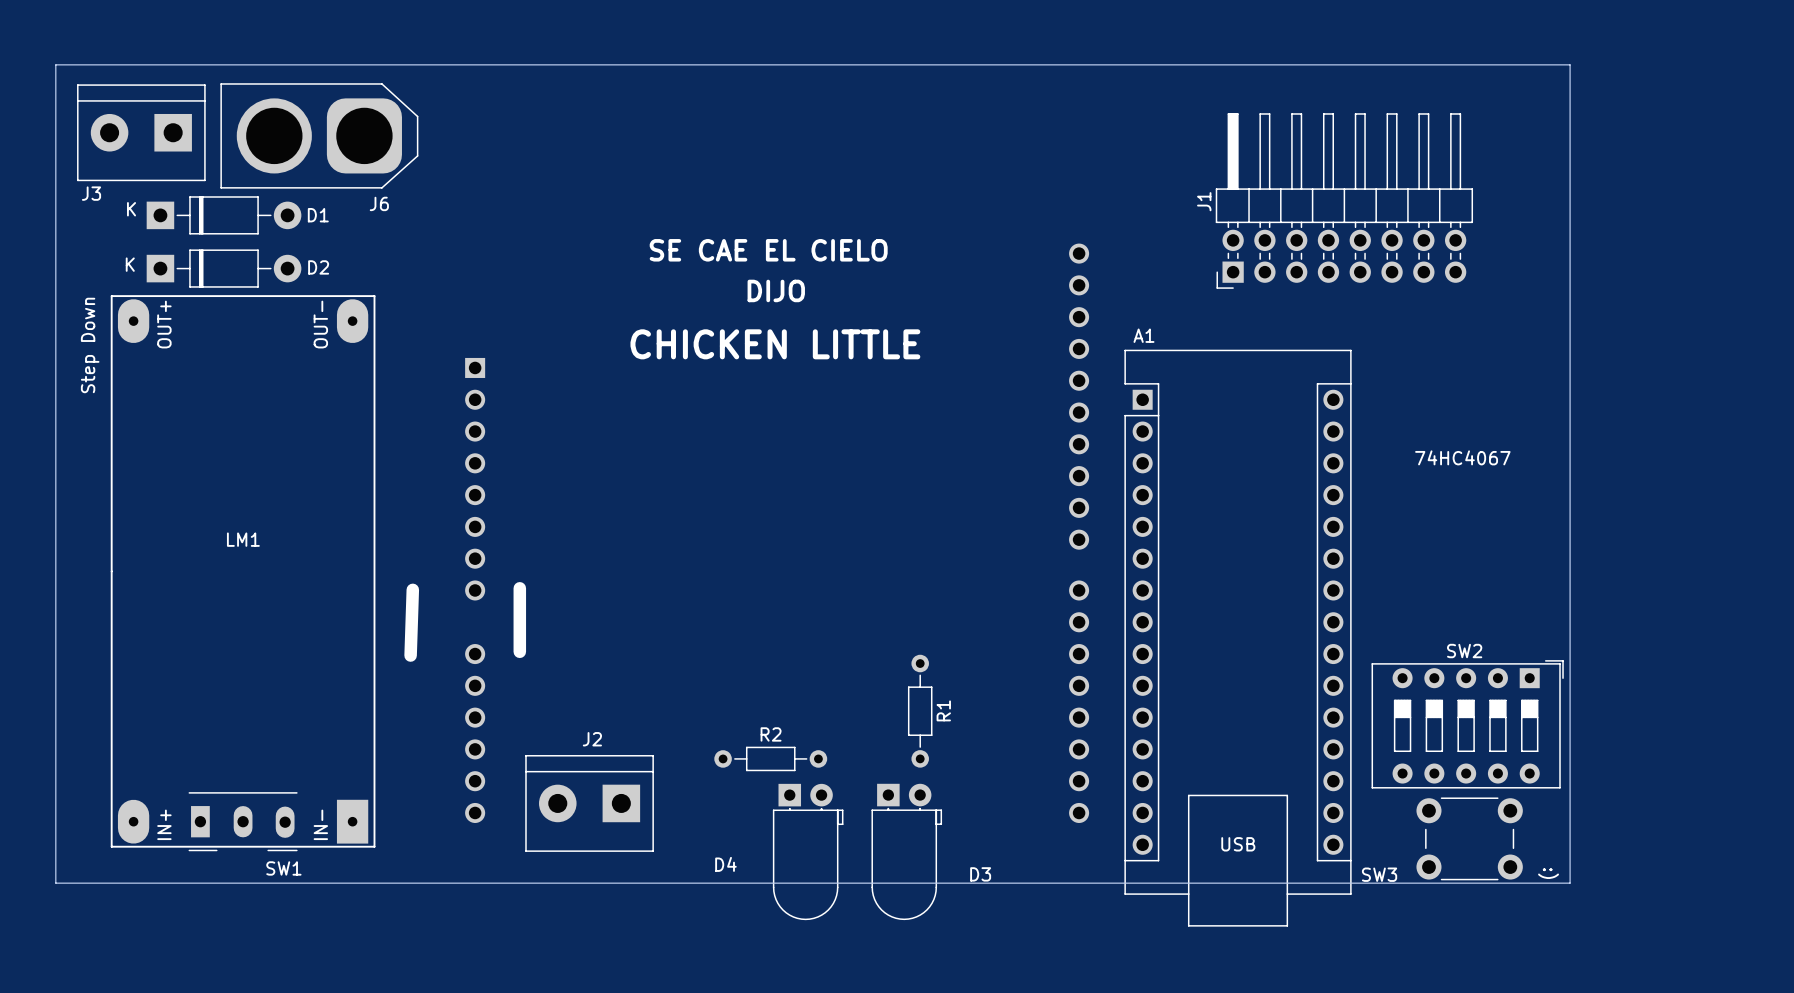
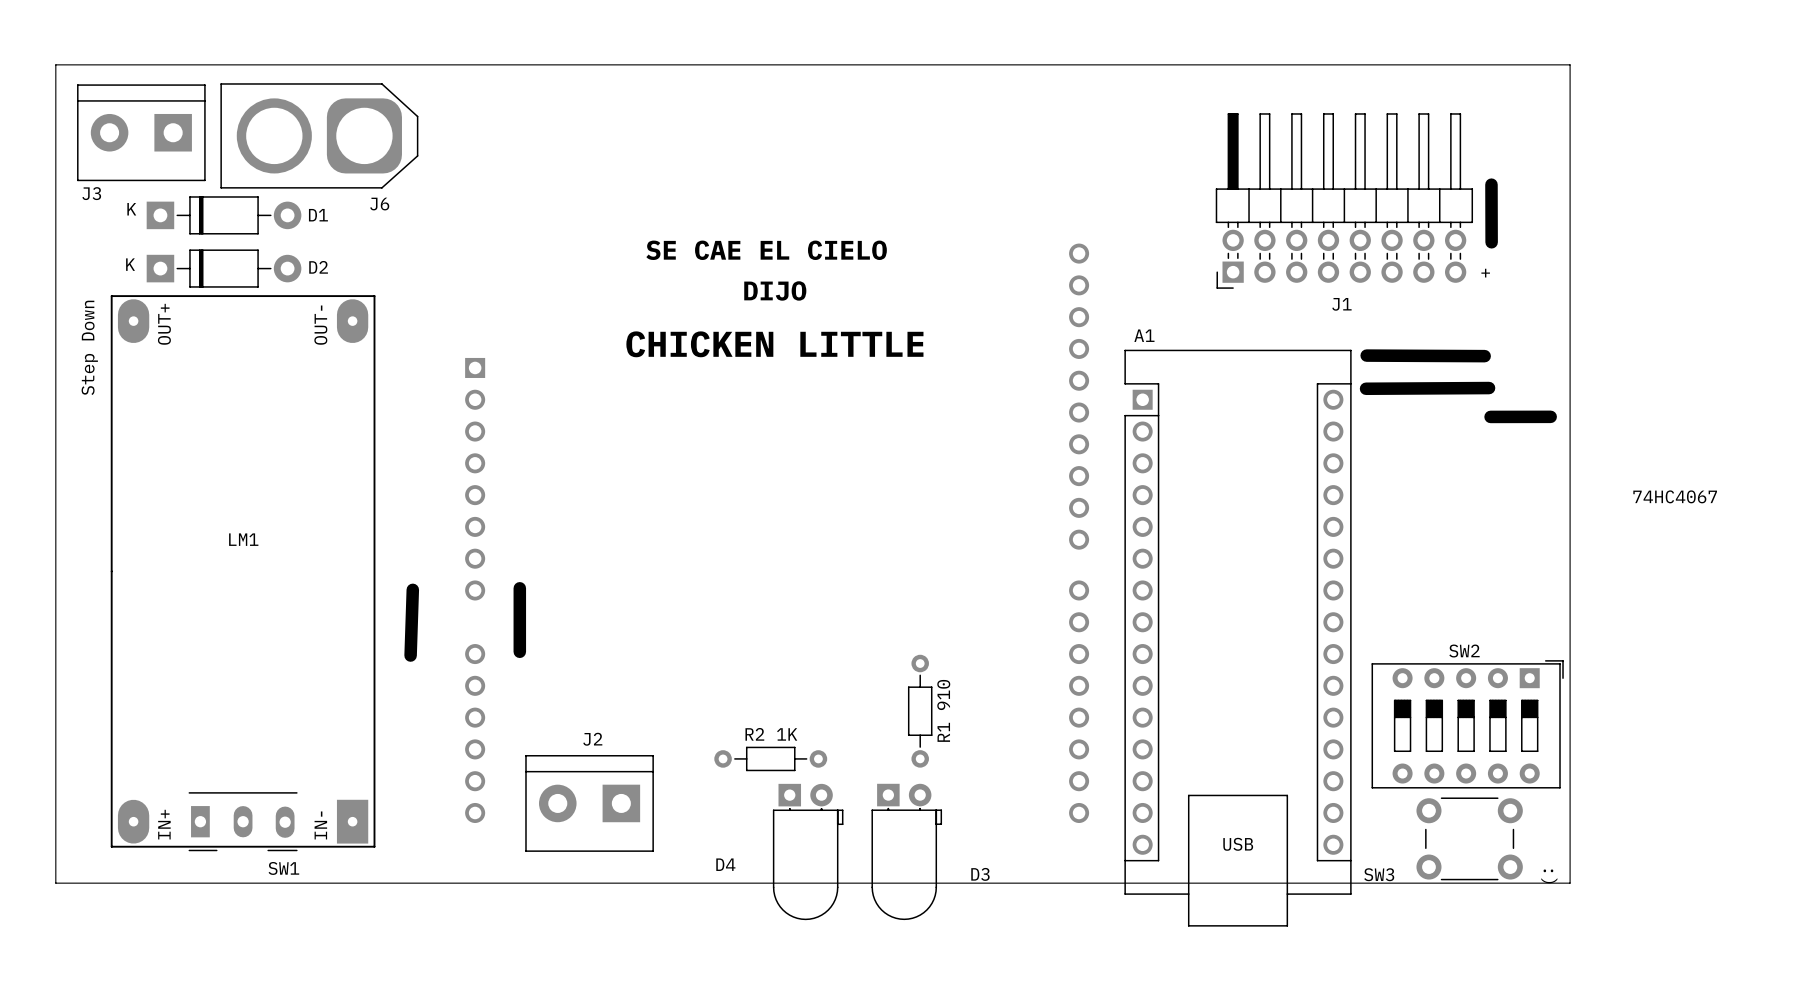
line: none -> (1491, 184) (1491, 242)
J1 name rotation: 0° (1204, 201) -> 90° clockwise (1341, 304)
J1 name position: J1 (1204, 201) -> J1 (1341, 304)
text: none -> + (1485, 273)
line: none -> (1366, 355) (1484, 356)
line: none -> (1489, 388) (1366, 388)
line: none -> (1490, 416) (1550, 416)
text position: 74HC4067 (1462, 457) -> 74HC4067 (1675, 496)
R1 name: R1 (943, 710) -> R1 910 (943, 710)
R2 name: R2 (771, 734) -> R2 1K (771, 734)

